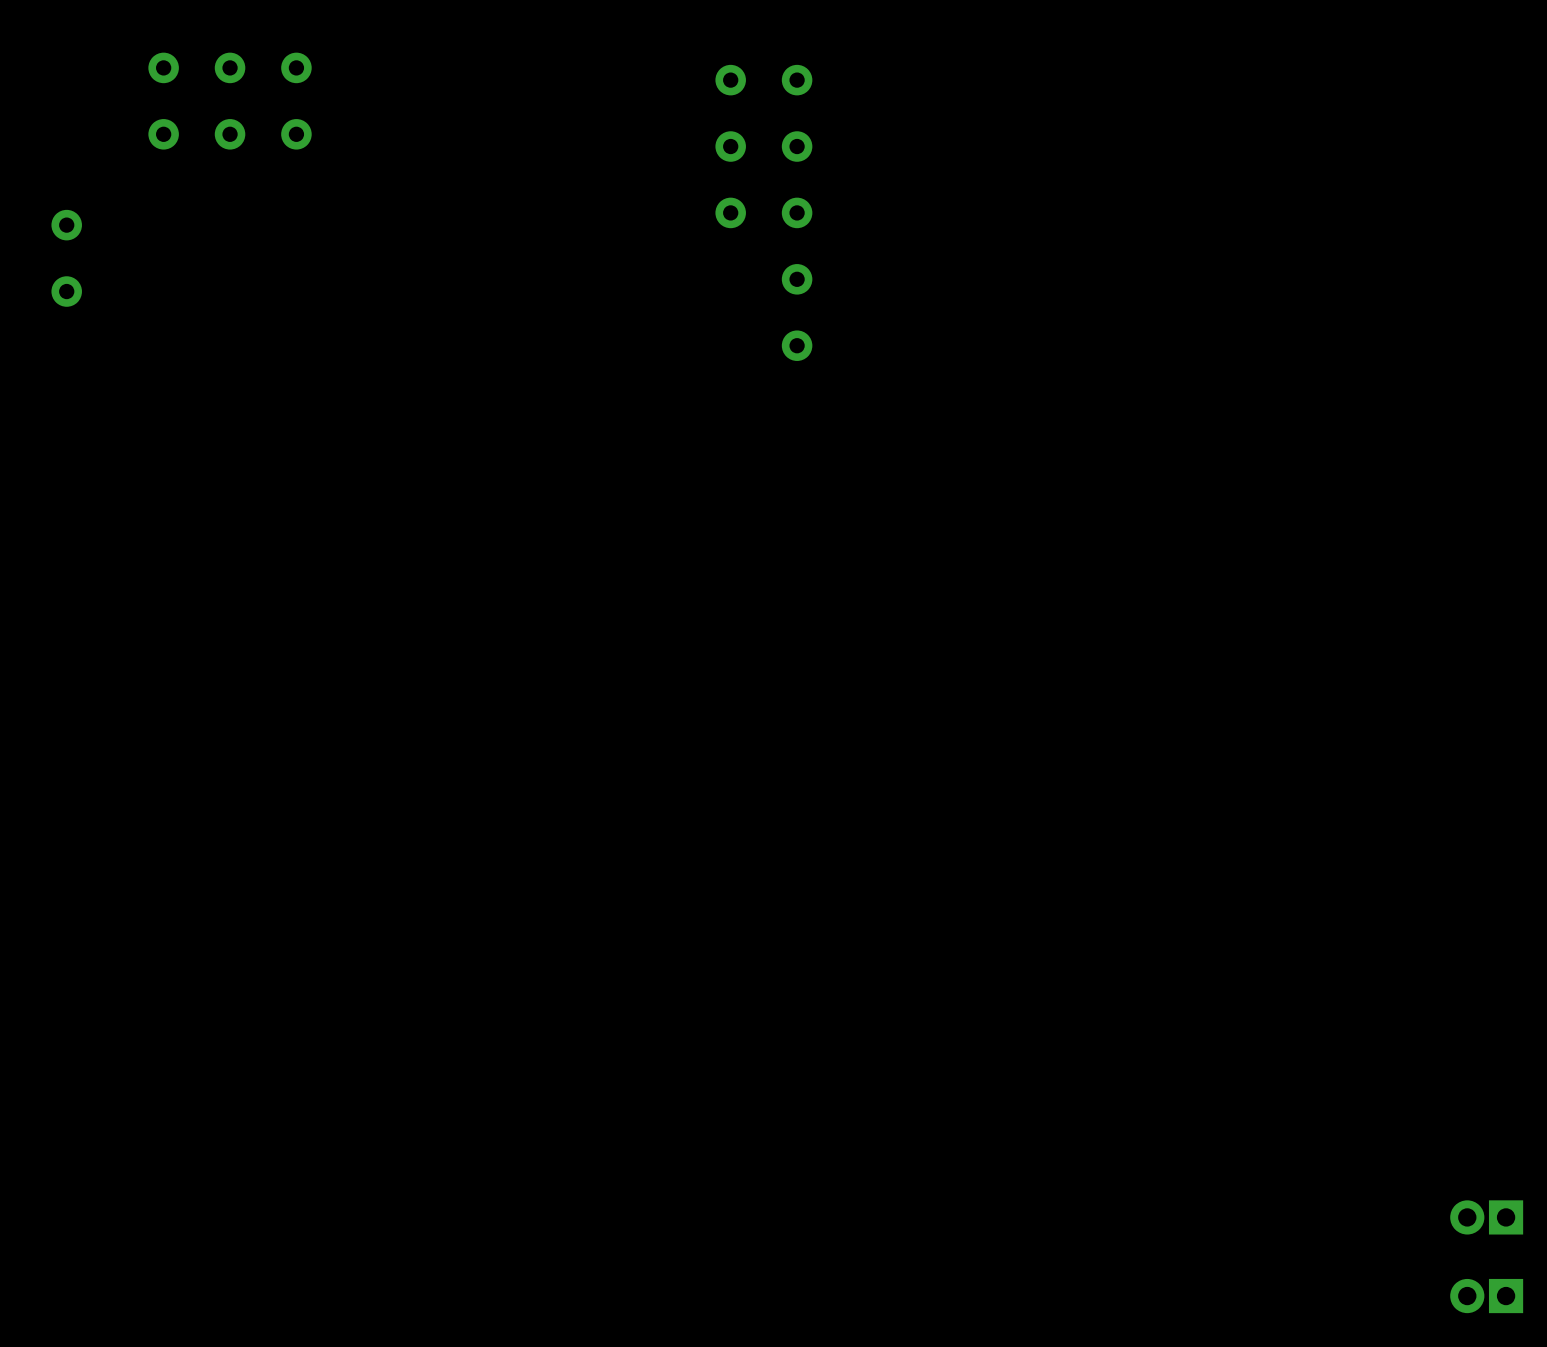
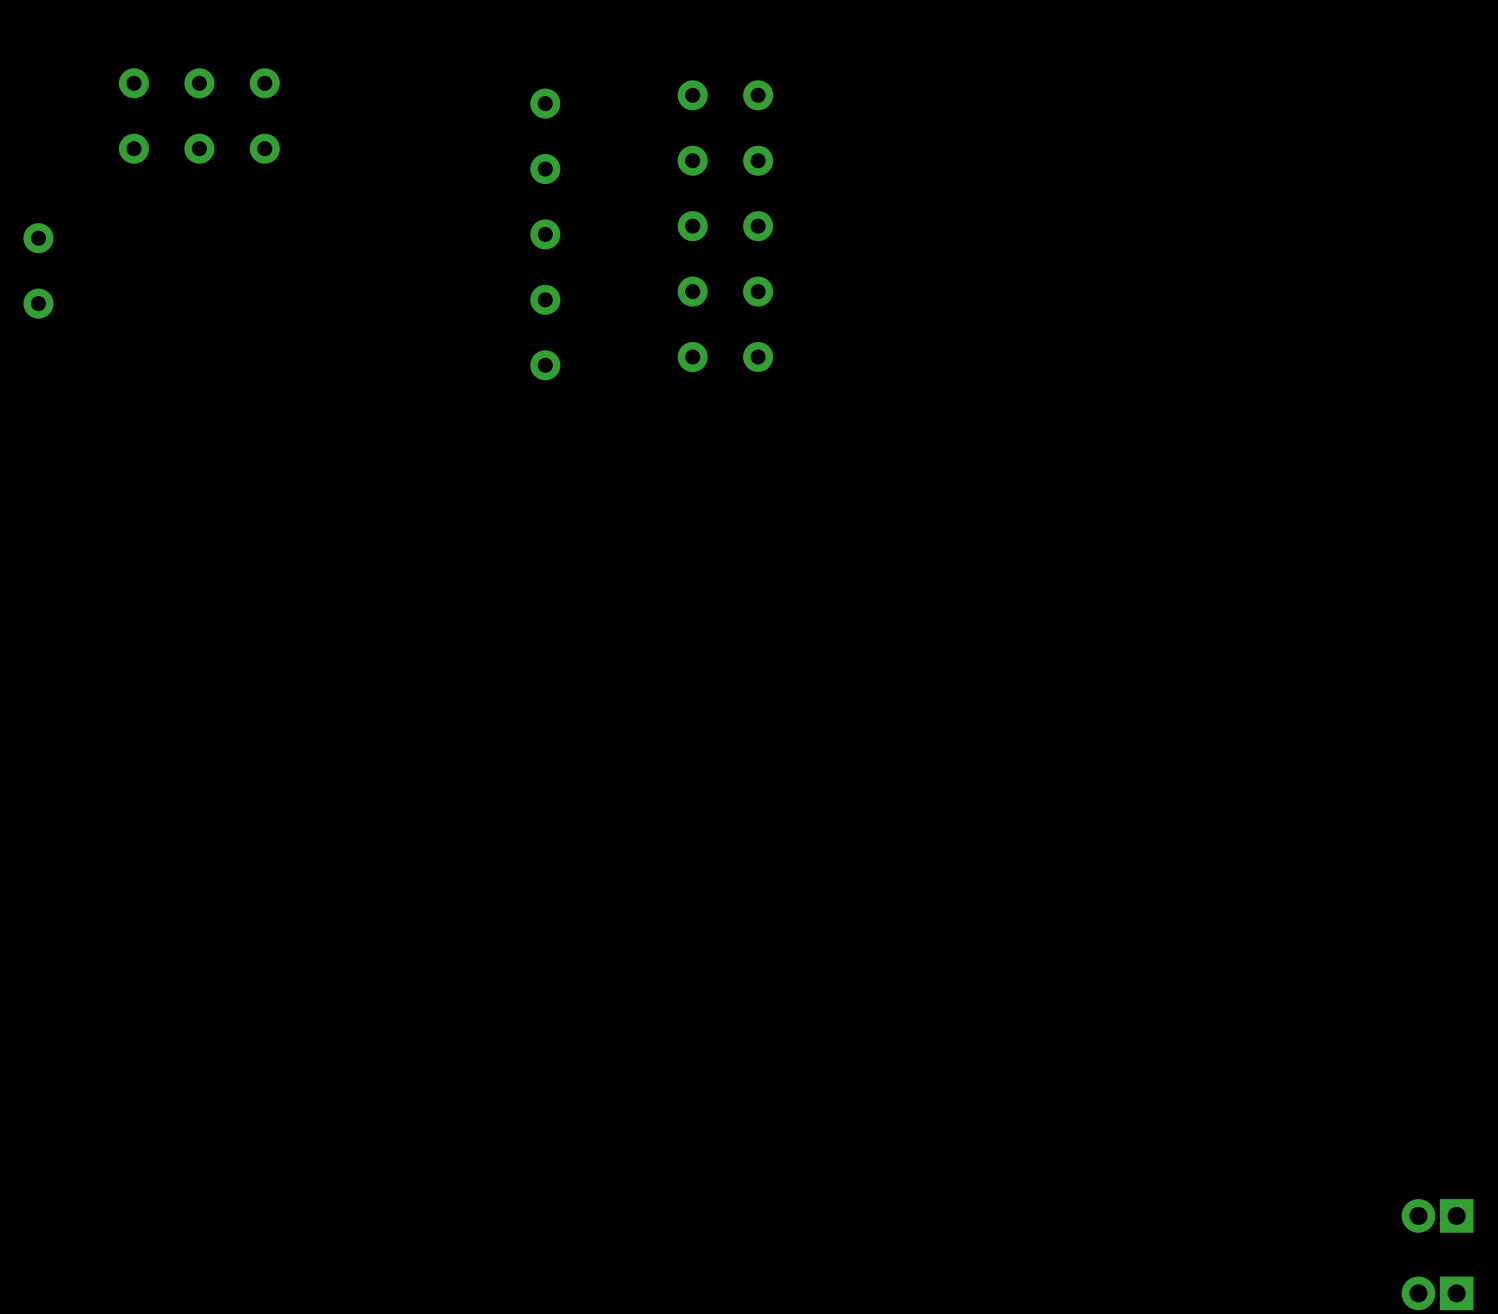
part: none -> (545, 103)
part: none -> (545, 169)
part: none -> (545, 234)
part: none -> (692, 291)
part: none -> (545, 299)
part: none -> (692, 357)
part: none -> (545, 365)

